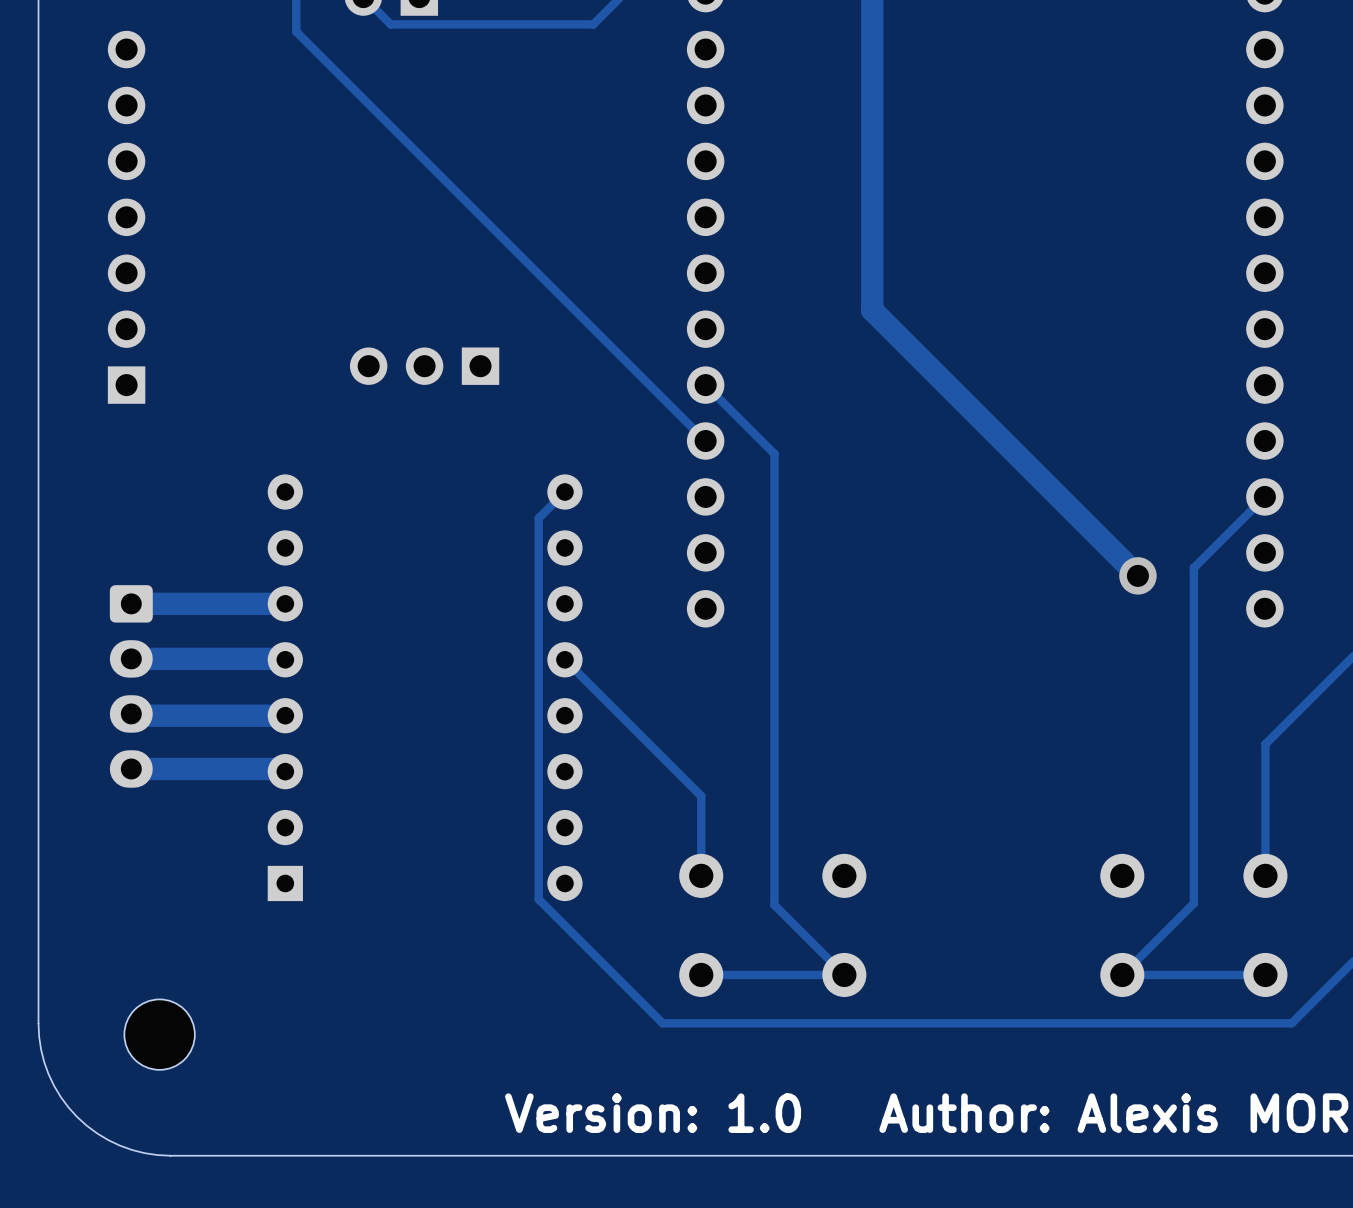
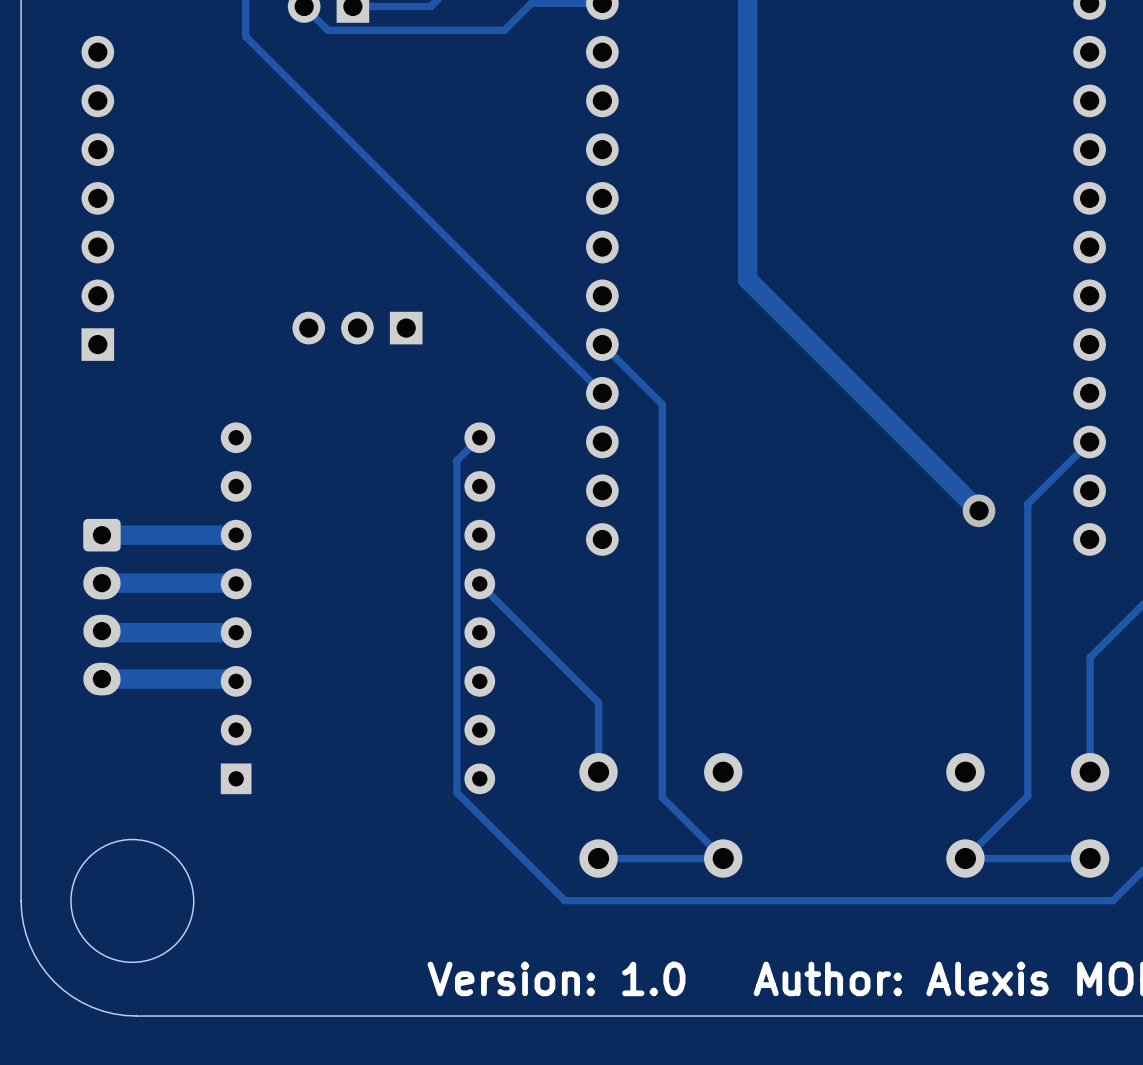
round board edge: none -> [70, 839, 195, 963]
part: (159, 1034) -> none

